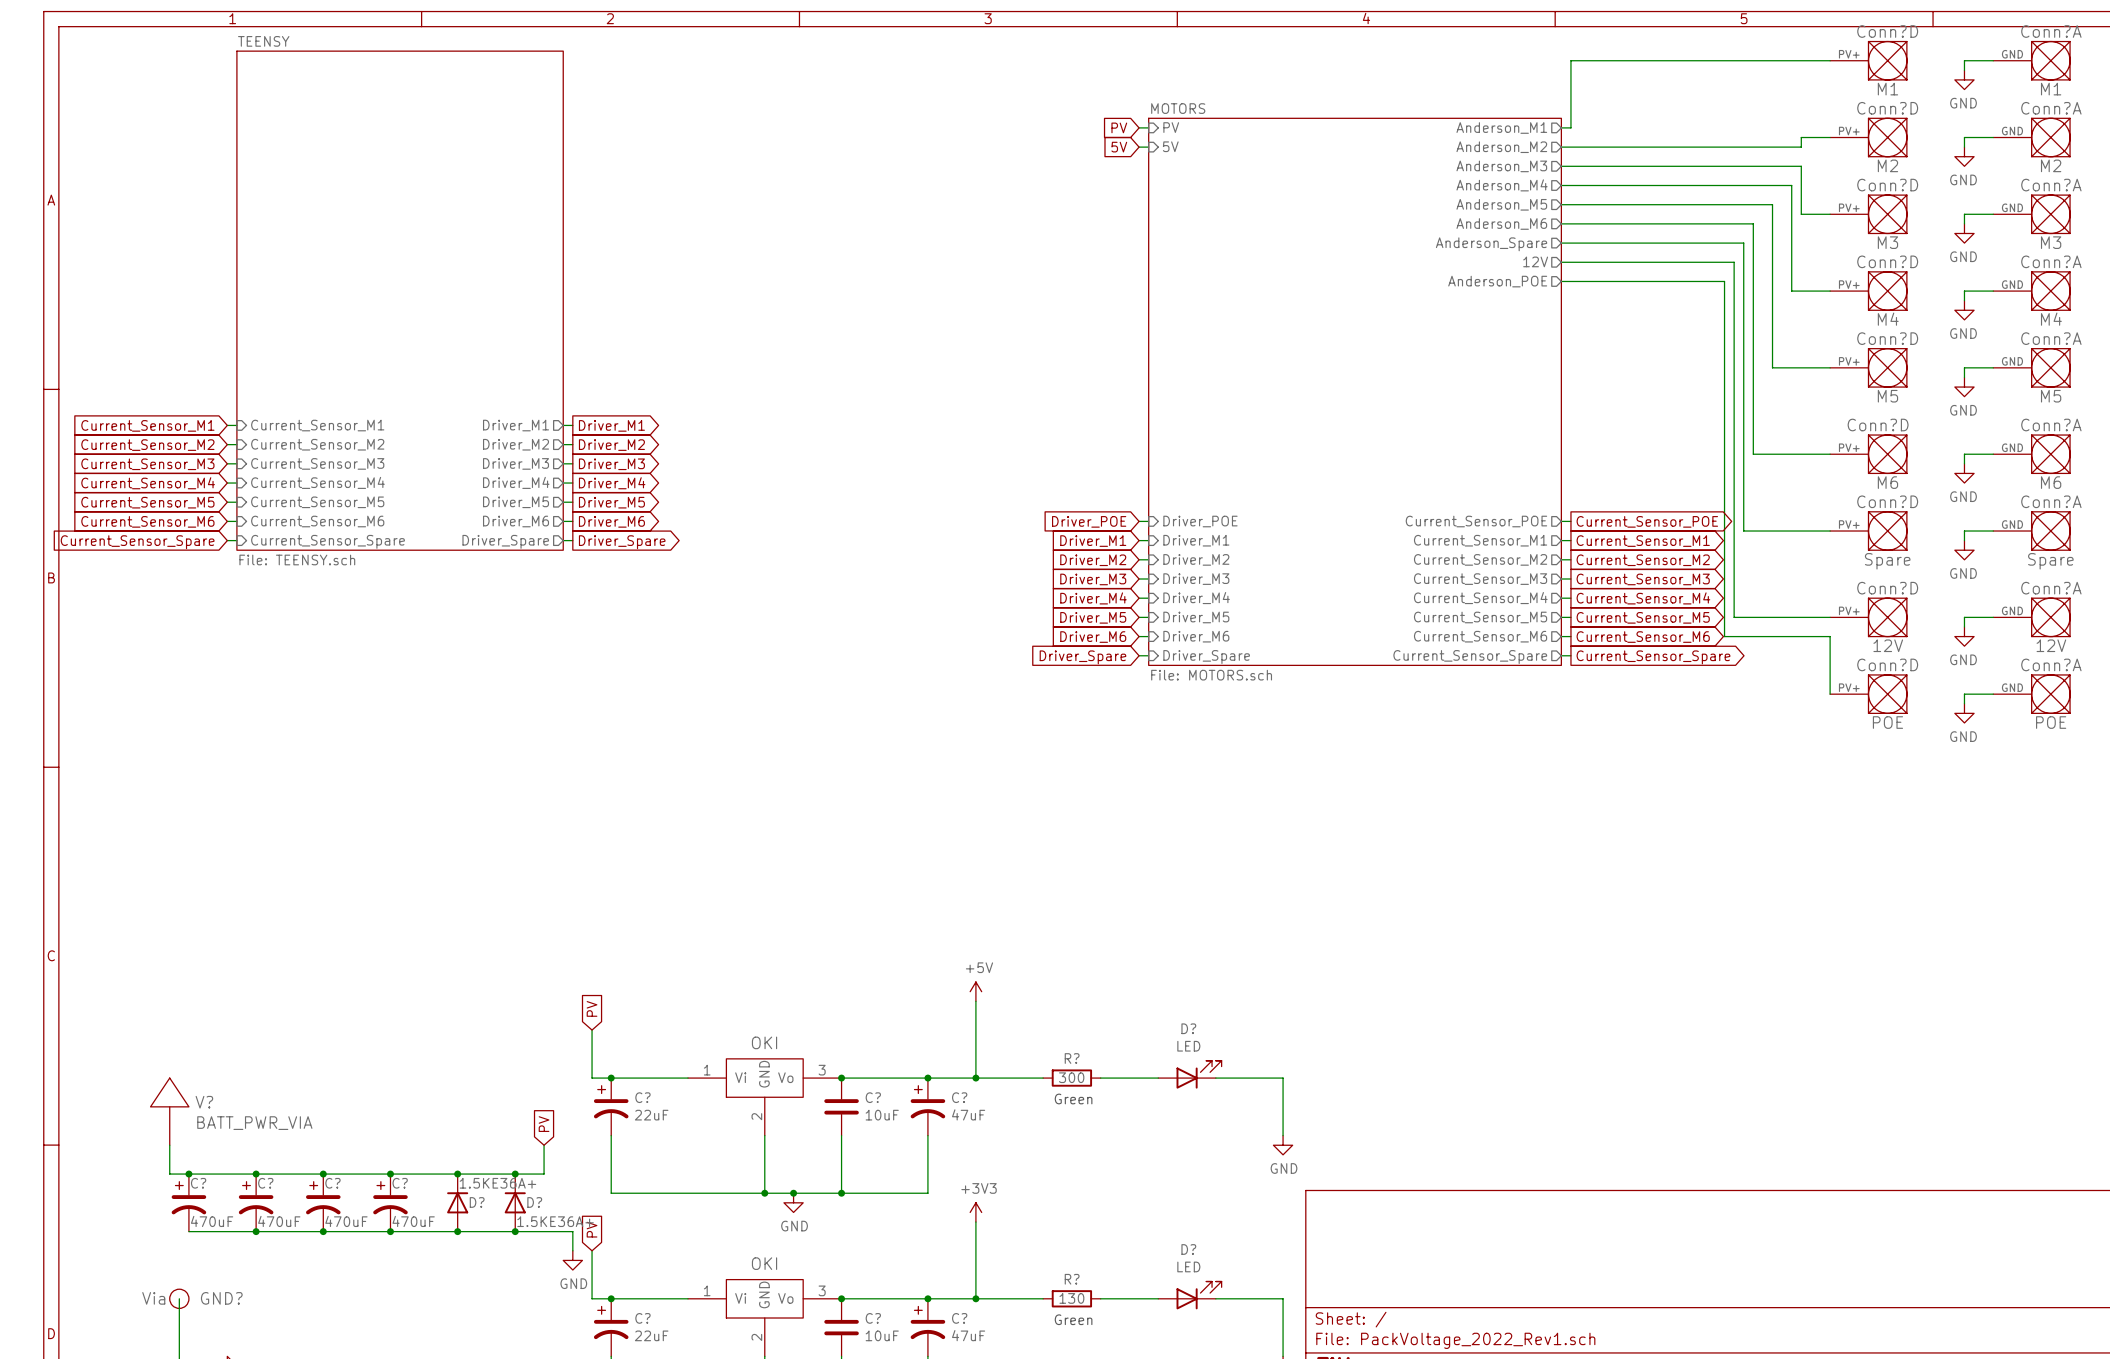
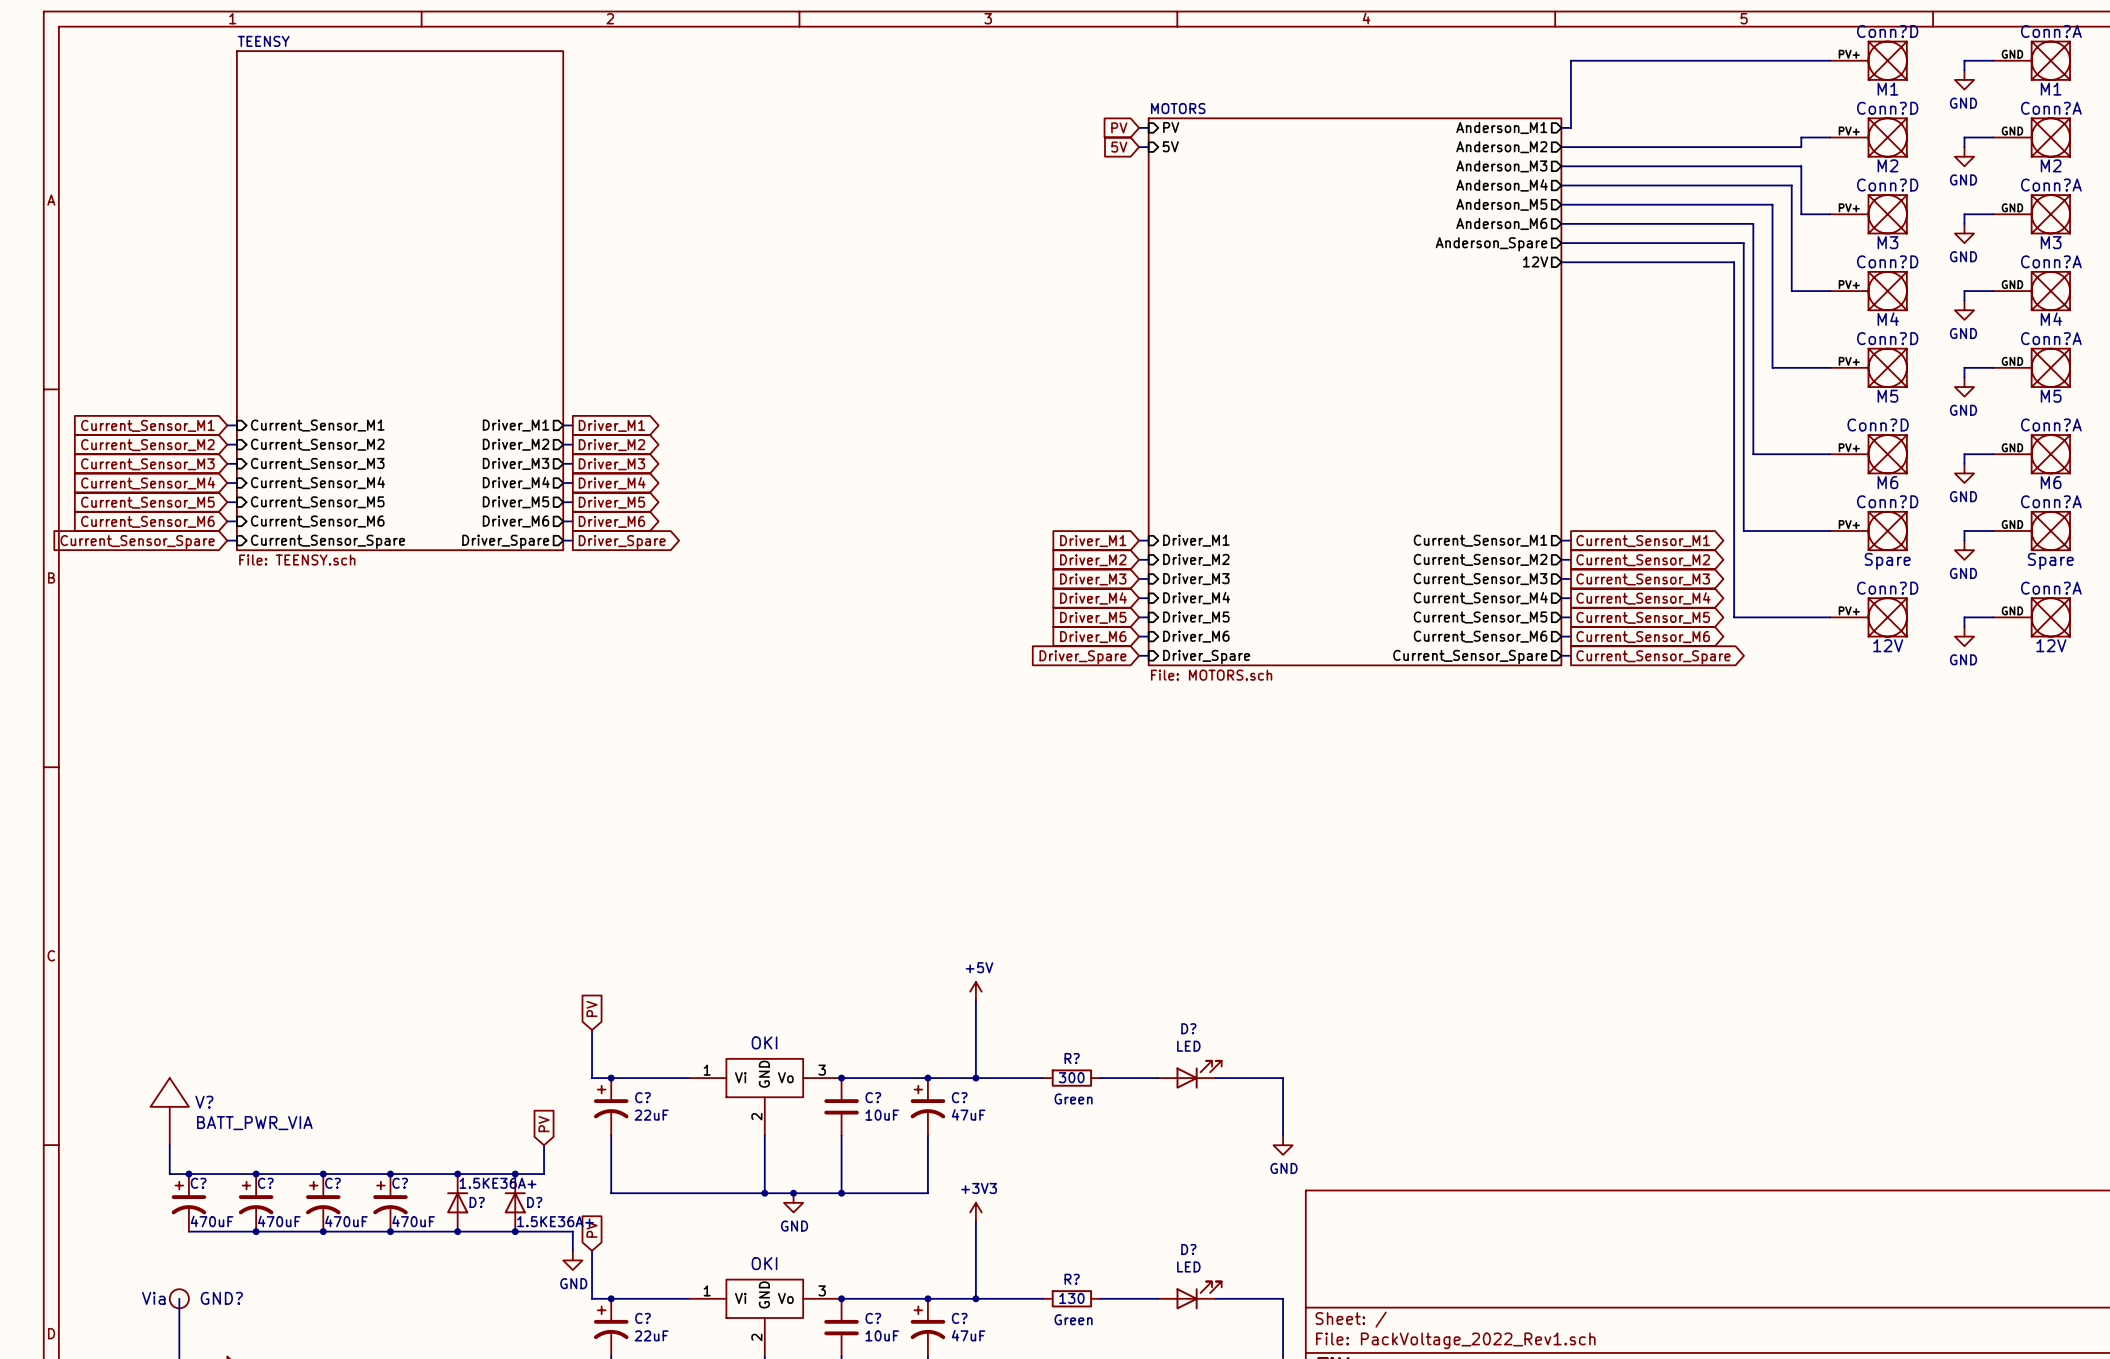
sheet pin: Anderson_POE (1497, 281) -> none
wire: (1561, 281) (1724, 281) (1724, 636) (1830, 636) (1830, 694) -> none
global label: Driver_POE (1089, 521) -> none
wire: (1139, 521) (1148, 521) -> none
sheet pin: Driver_POE (1200, 521) -> none
sheet pin: Current_Sensor_POE (1476, 521) -> none
wire: (1561, 521) (1570, 521) -> none
global label: Current_Sensor_POE (1647, 521) -> none
Conn?D: POE (1868, 694) -> none
wire: (1993, 694) (1964, 694) (1964, 703) -> none
Conn?A: POE (2031, 694) -> none
power symbol: GND (1964, 713) -> none

